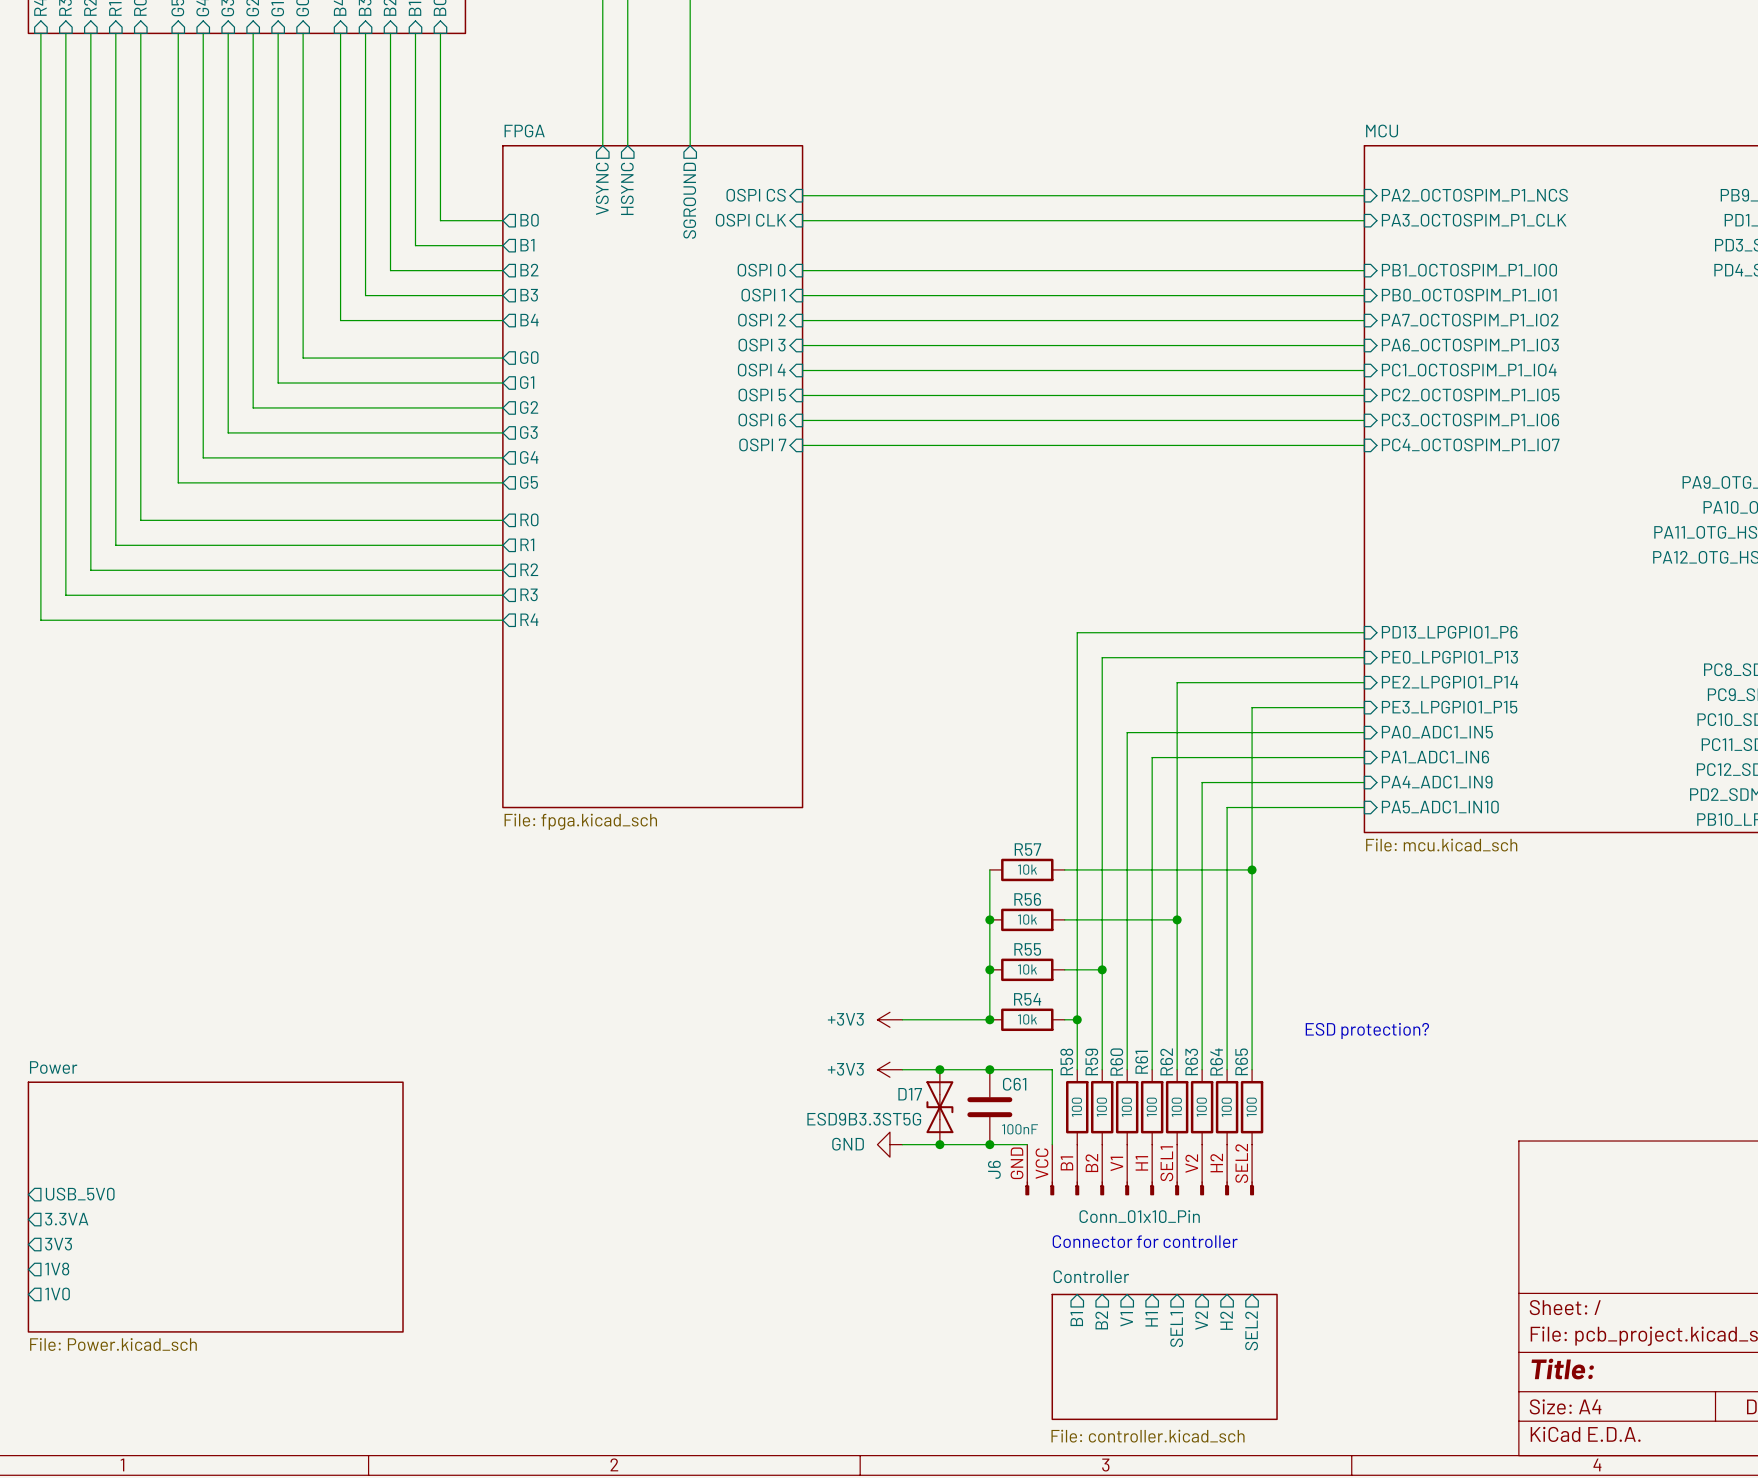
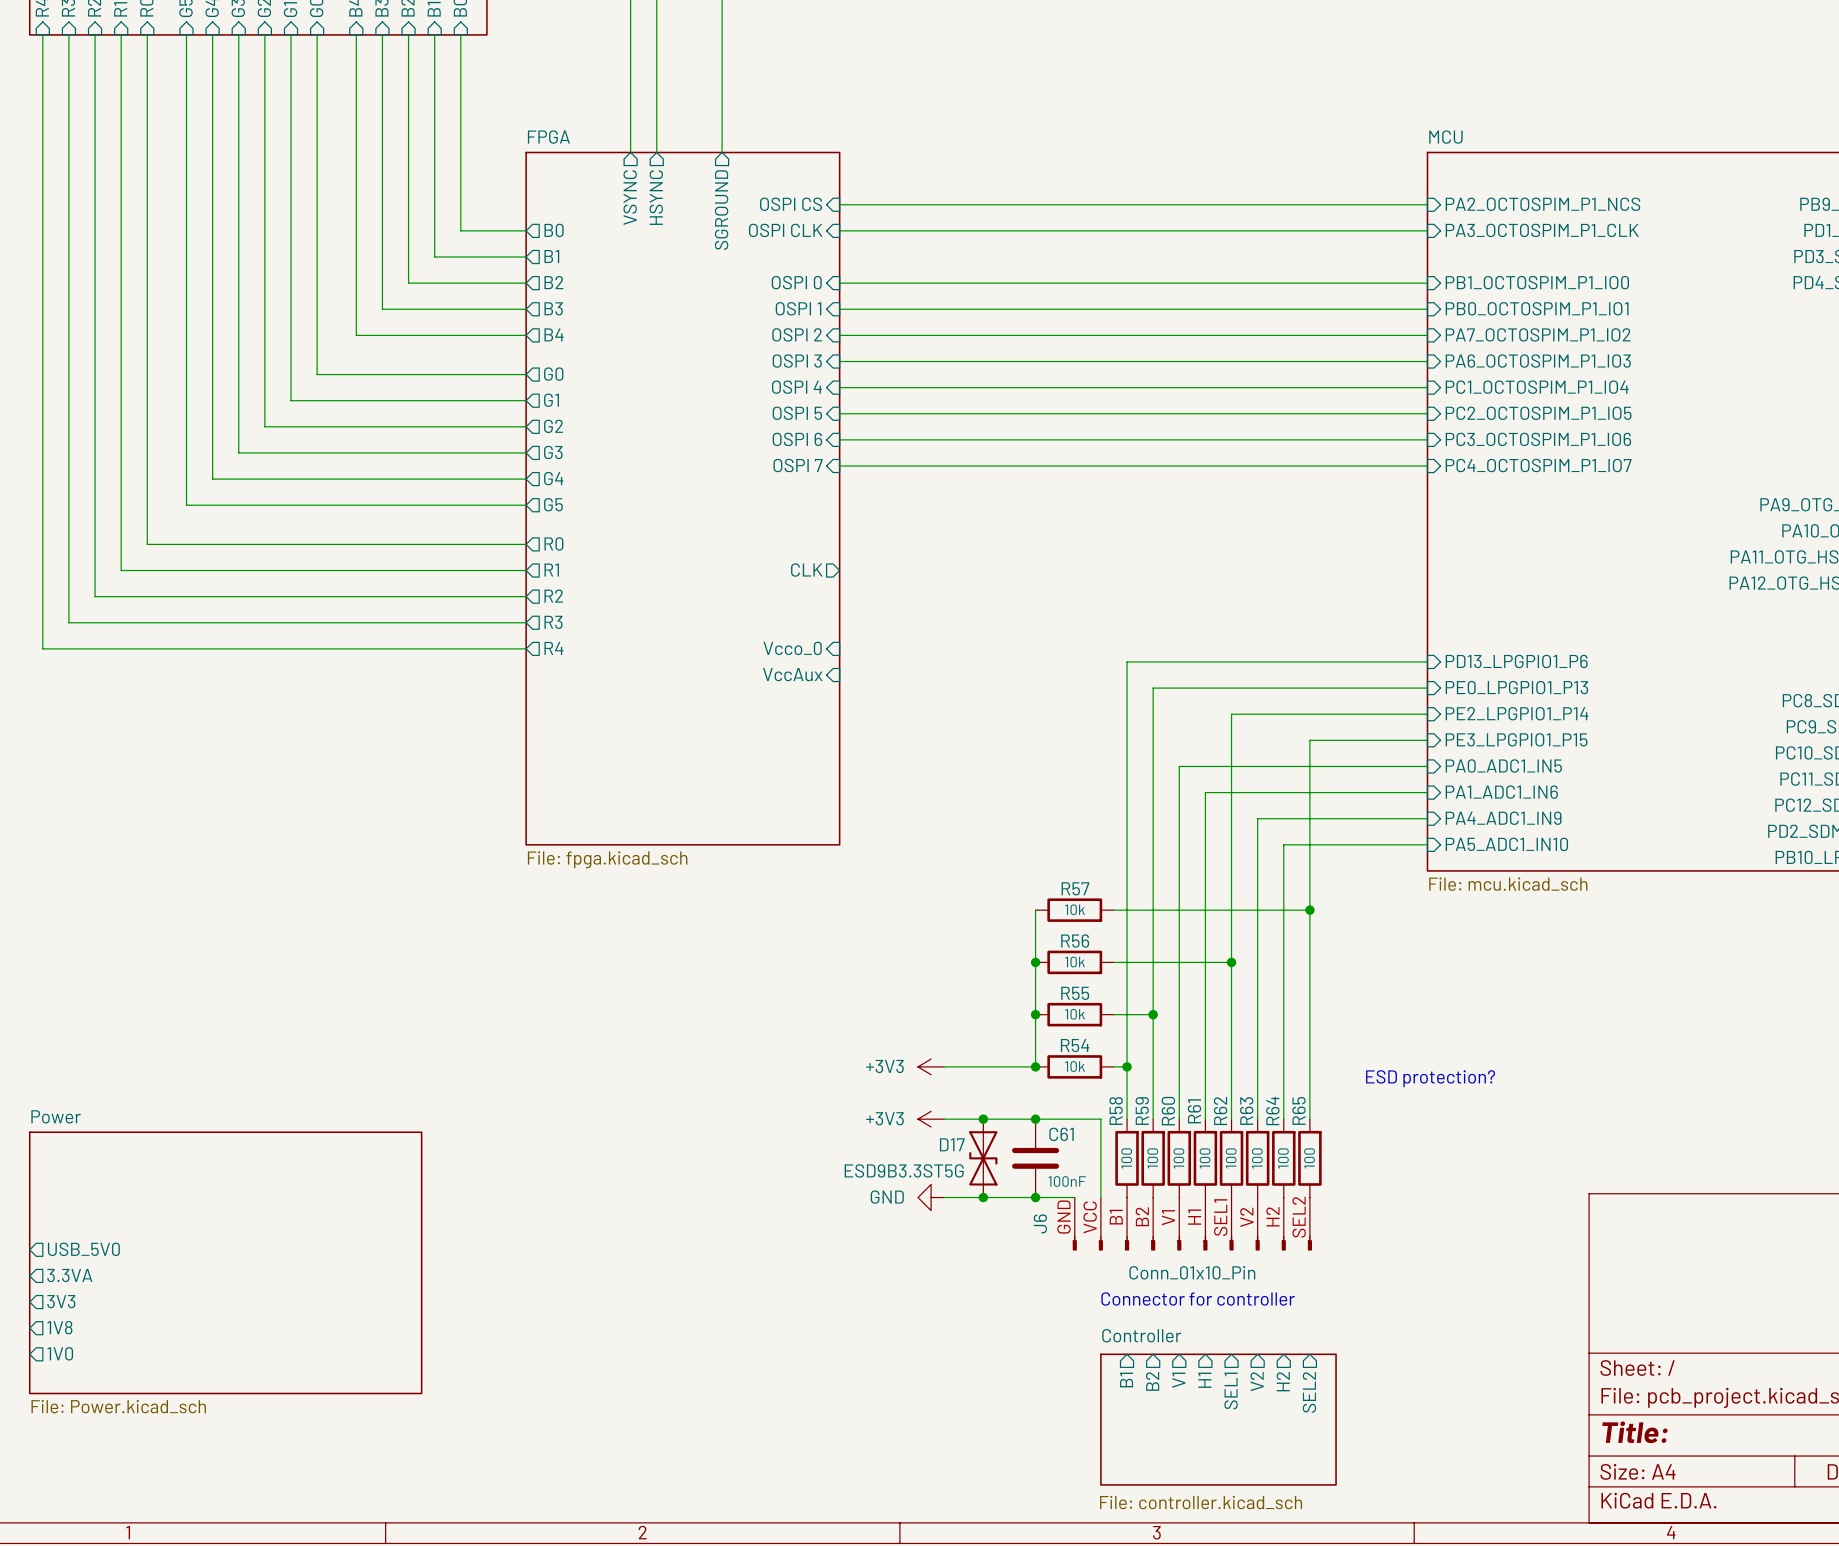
sheet pin: none -> CLK (806, 570)
sheet pin: none -> Vcco_0 (792, 648)
sheet pin: none -> VccAux (792, 674)

